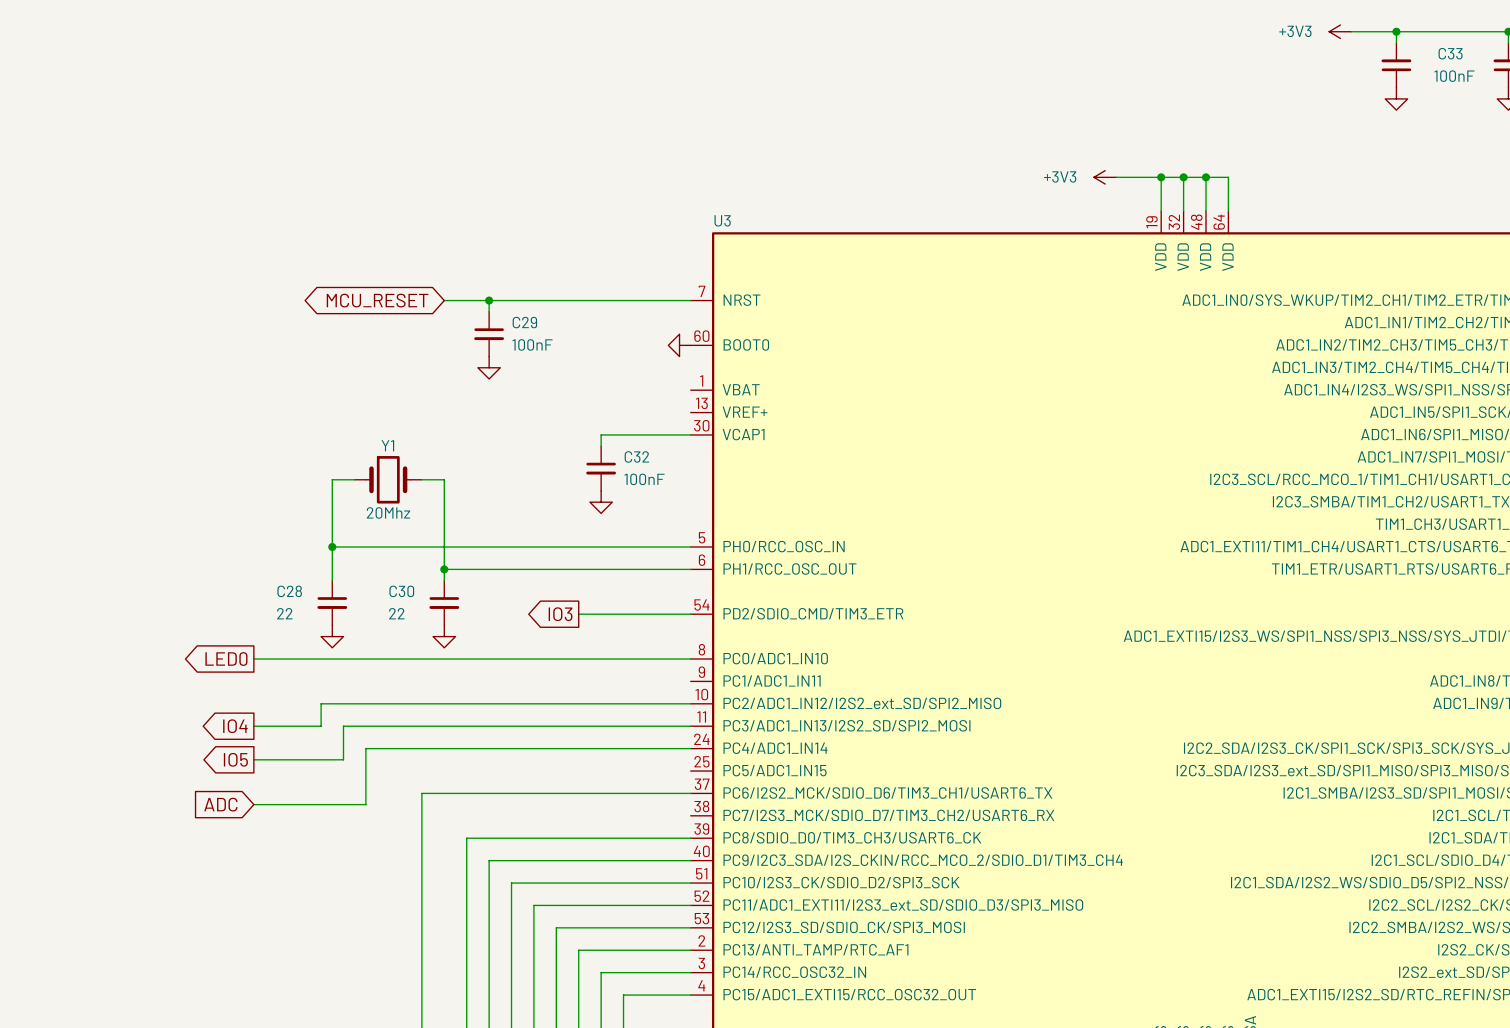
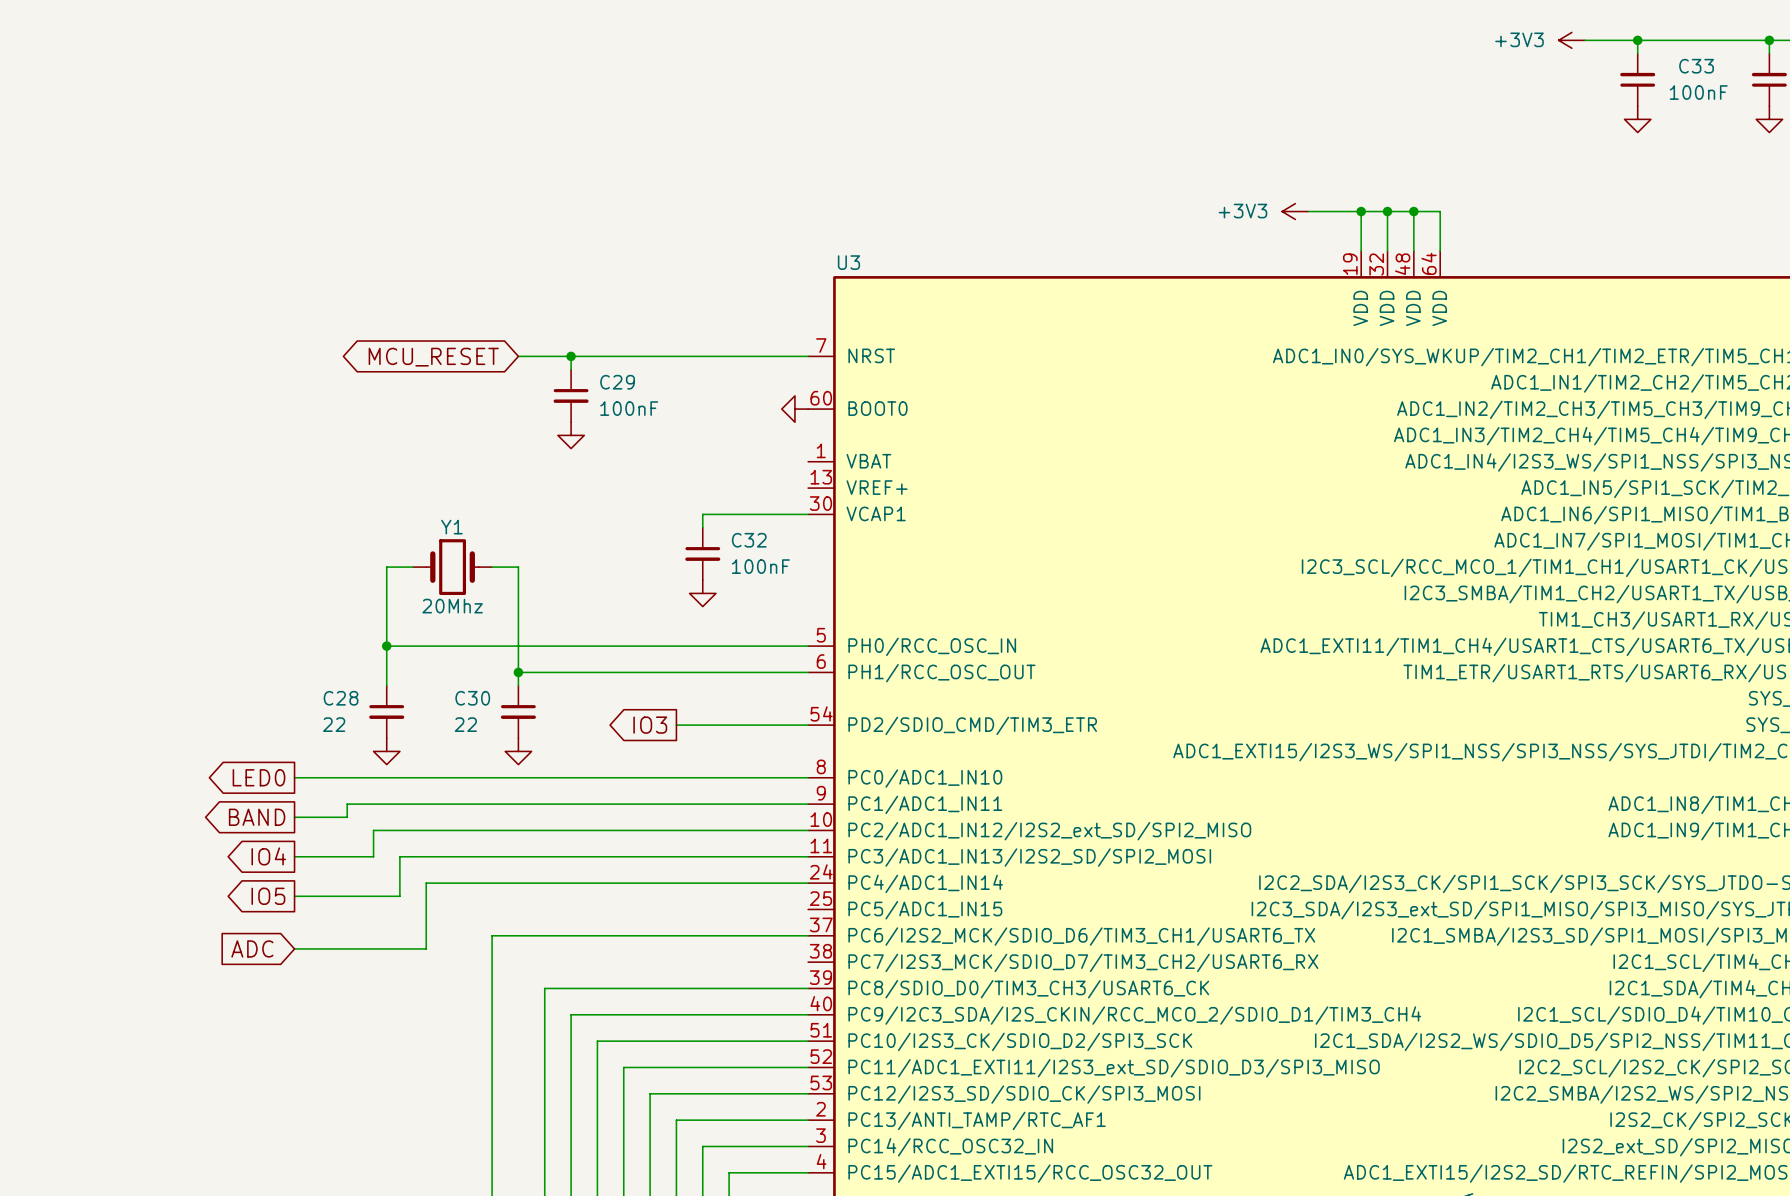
wire: none -> (808, 804) (347, 804) (347, 817) (294, 817)
global label: none -> BAND (257, 817)

